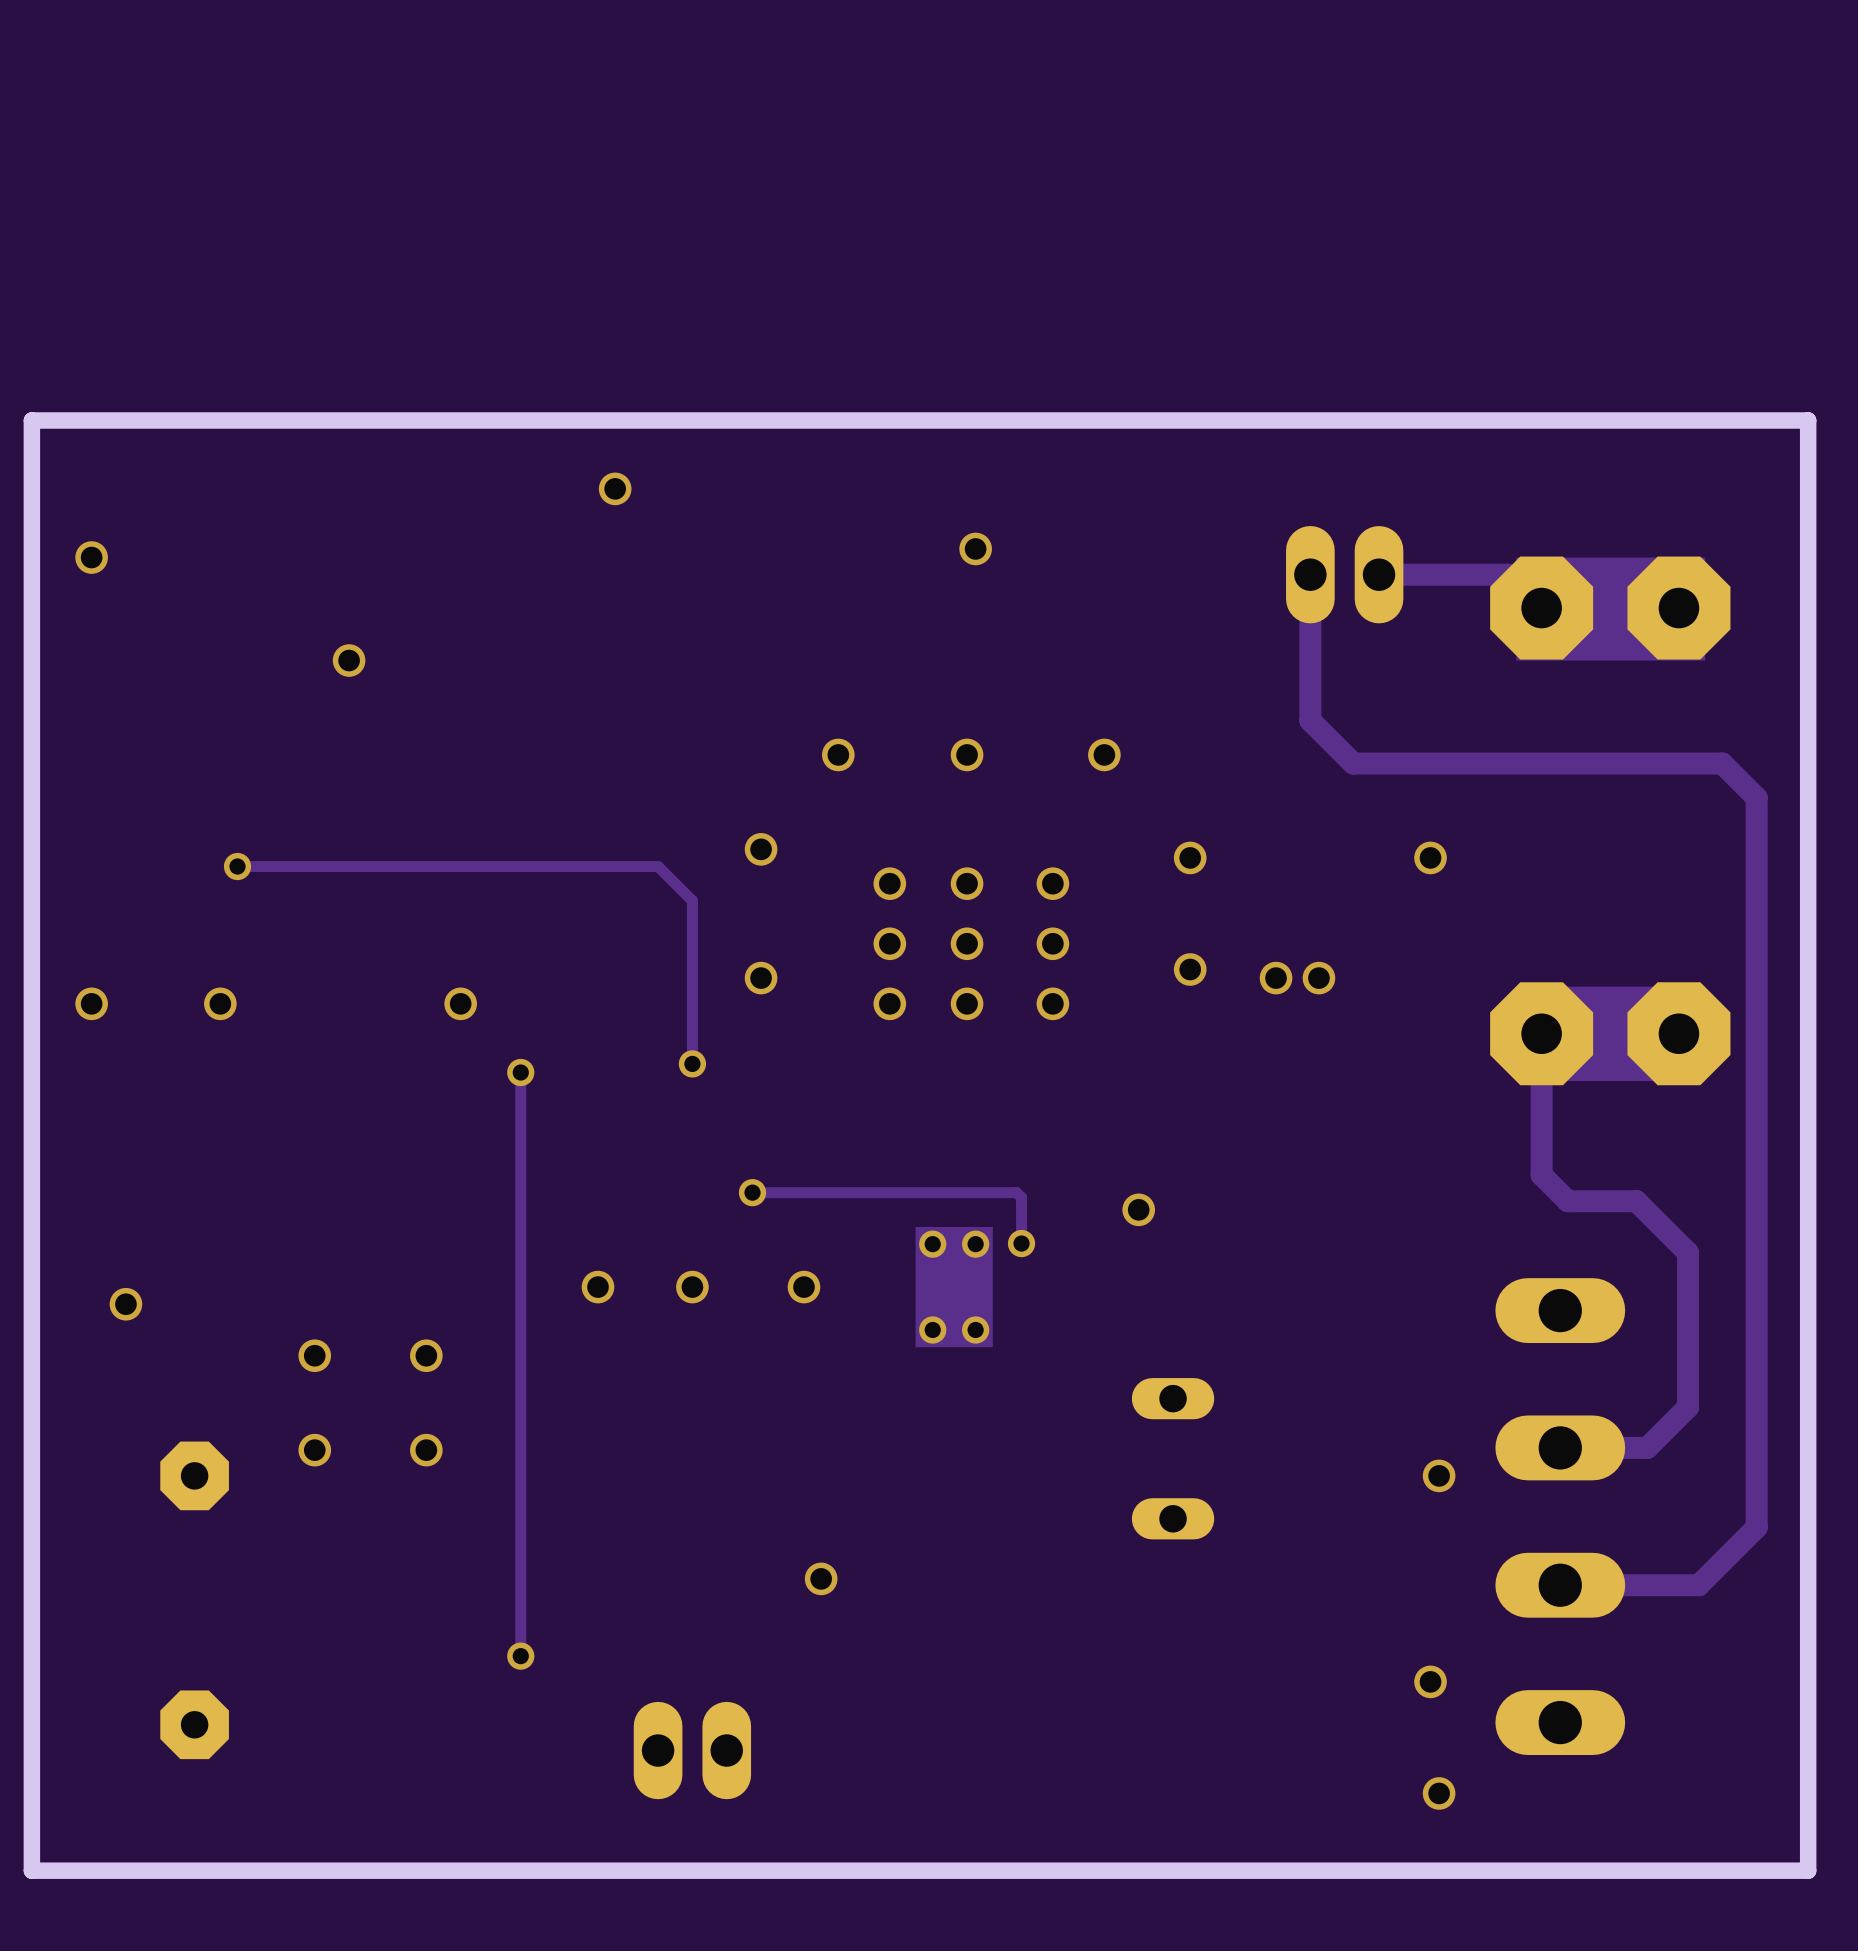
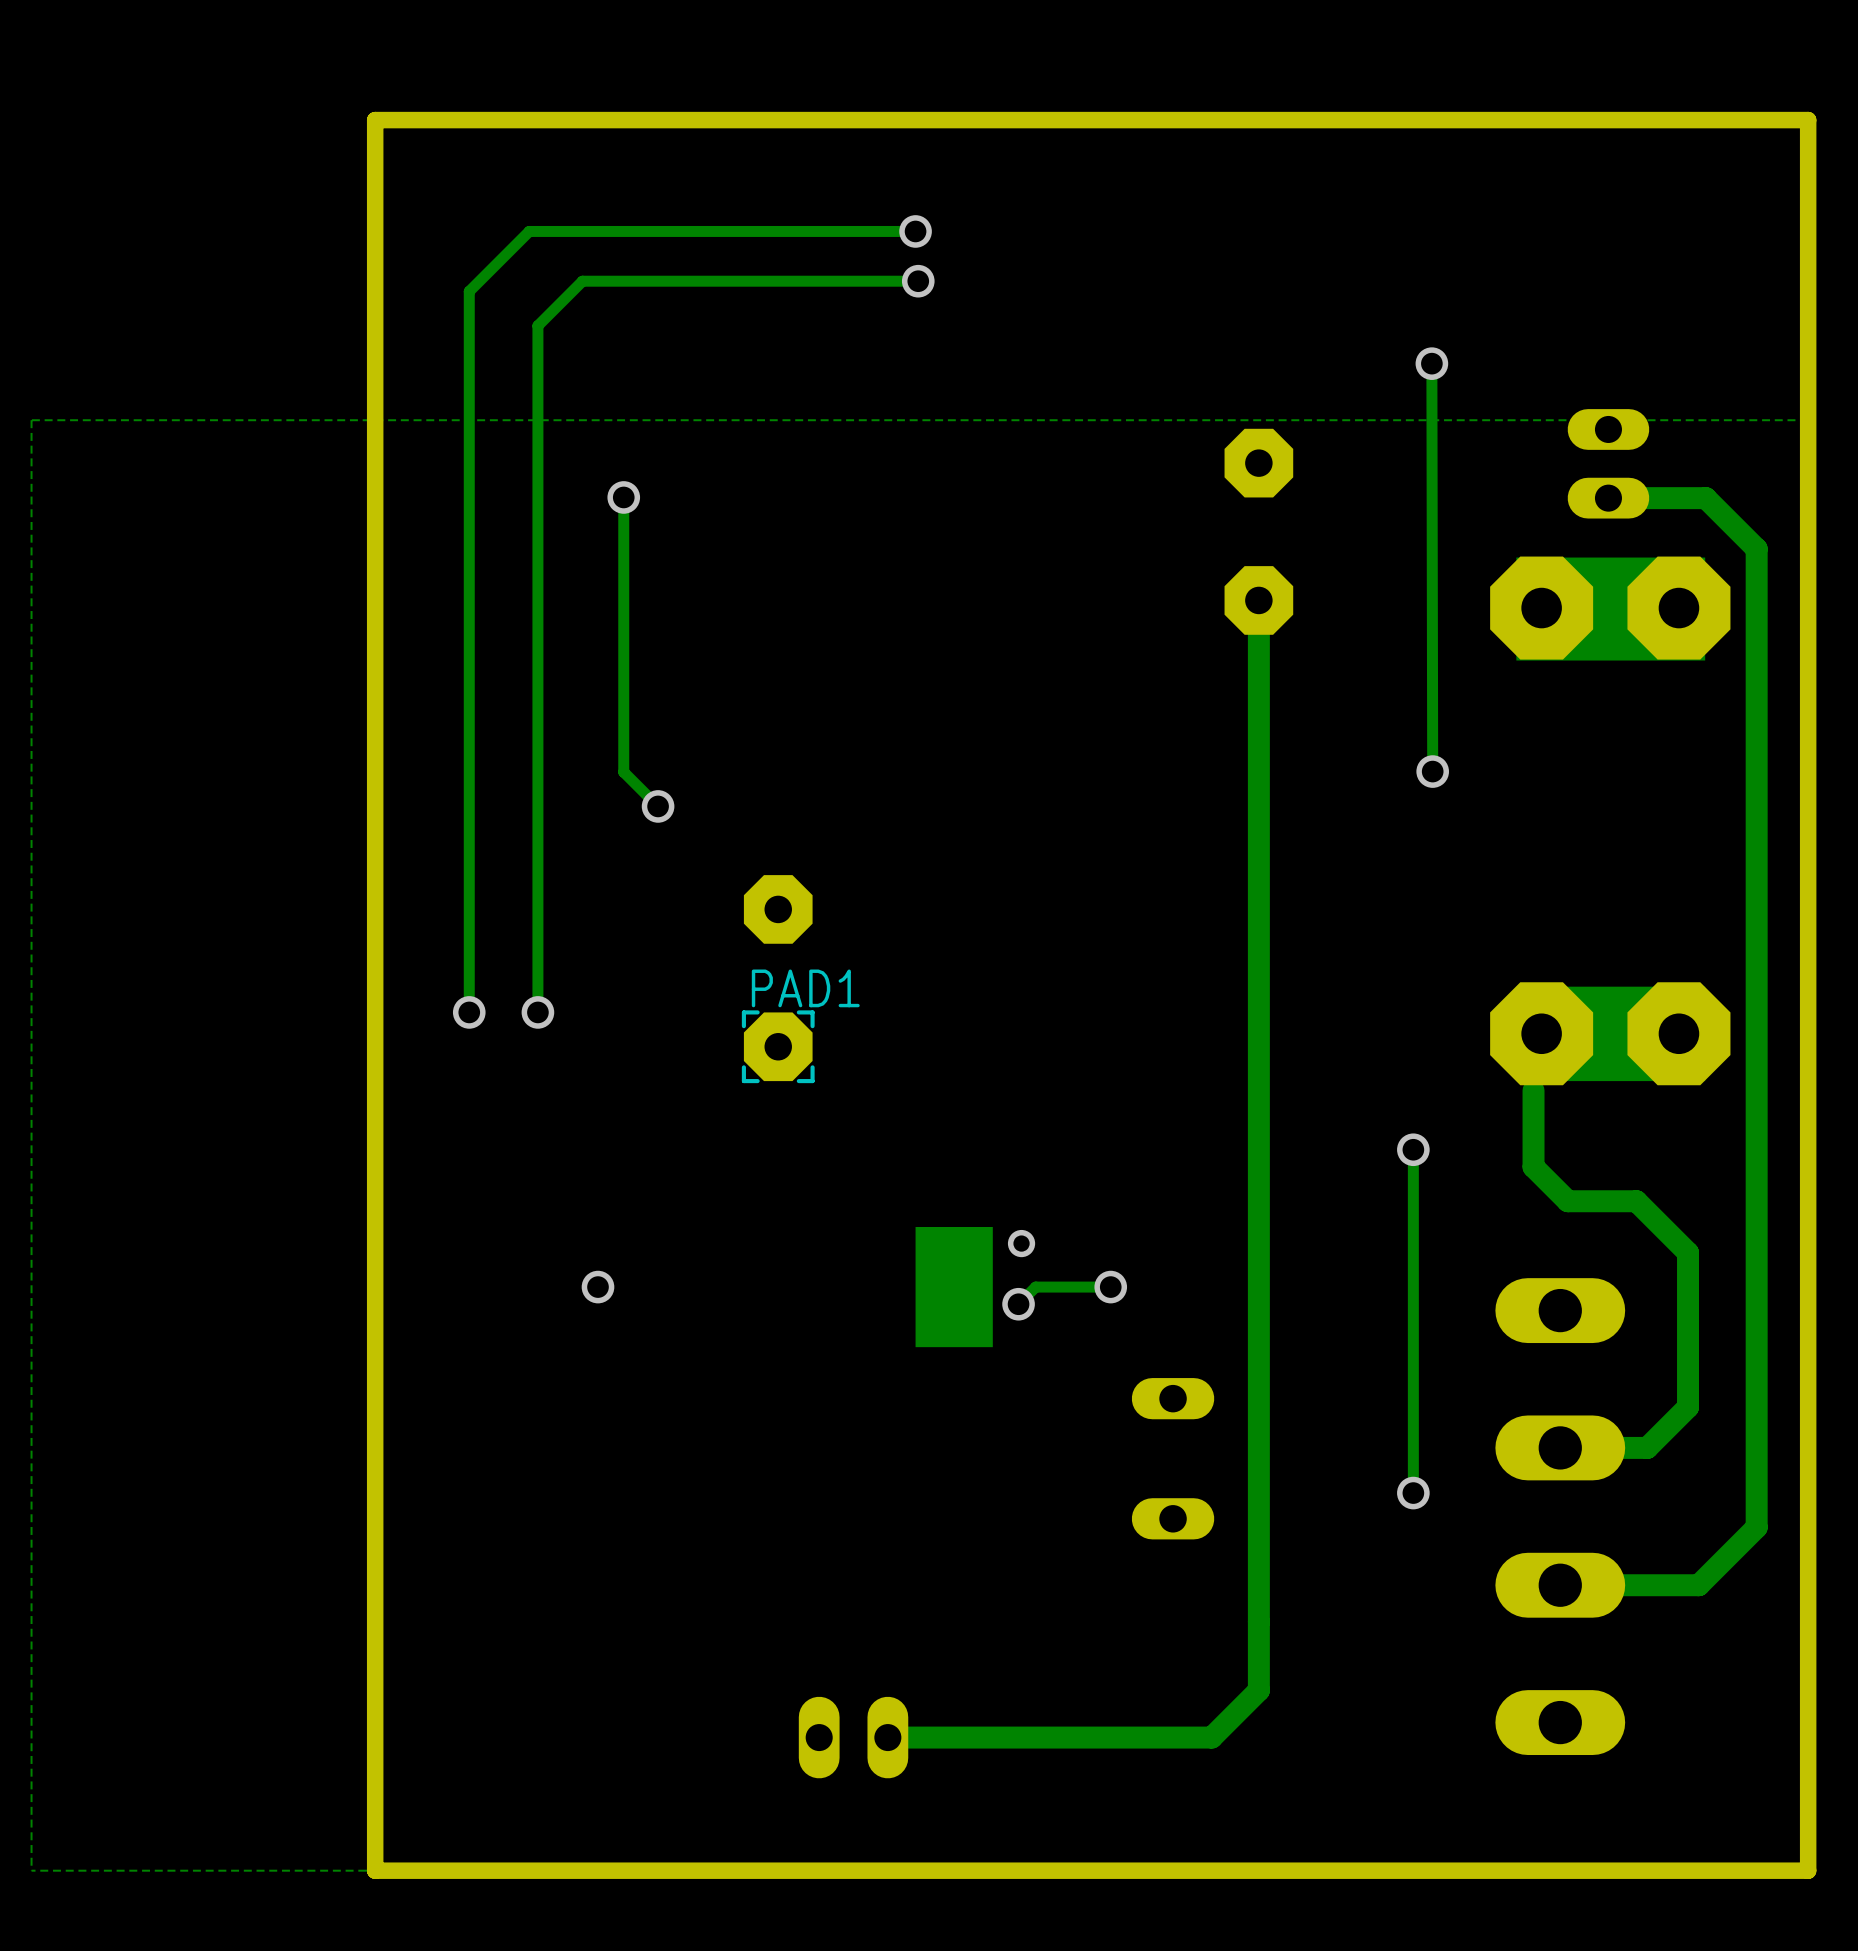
track: none -> (915, 231) (529, 231) (469, 291) (469, 1012)
via: none -> (915, 231)
track: none -> (918, 281) (582, 281) (537, 325) (537, 1012)
via: none -> (918, 281)
track: none -> (1431, 363) (1432, 771)
via: none -> (1431, 363)
board edge: (1808, 420) (31, 420) (31, 1870) (375, 1870) -> (1808, 420) (1808, 120) (375, 120) (375, 1870)
part: none -> (1258, 463)
part: none -> (1608, 463)
via position: (615, 488) -> (623, 497)
track: none -> (623, 497) (623, 772) (658, 806)
via: (975, 548) -> none
via: (91, 557) -> none
track: (1310, 574) (1310, 720) (1353, 763) (1722, 763) (1756, 797) -> (1608, 498) (1705, 498) (1756, 548) (1756, 797)
part: (1344, 574) -> none
track: (1379, 574) (1508, 574) (1541, 608) -> none
track: none -> (1258, 600) (1258, 1690) (1211, 1737) (887, 1737)
part: none -> (1258, 600)
via: (349, 660) -> none
via: (838, 754) -> none
via: (967, 754) -> none
via: (1104, 754) -> none
via: none -> (658, 806)
via: (761, 849) -> none
via: (1190, 857) -> none
via position: (1430, 857) -> (1432, 771)
track: (237, 866) (658, 866) (692, 900) (692, 1063) -> none
via: (237, 866) -> none
via: (889, 883) -> none
via: (967, 883) -> none
via: (1052, 883) -> none
part: none -> (778, 909)
via: (889, 943) -> none
via: (967, 943) -> none
via: (1052, 943) -> none
via: (1190, 969) -> none
via: (761, 978) -> none
via: (1276, 978) -> none
via: (1318, 978) -> none
via: (91, 1003) -> none
via: (220, 1003) -> none
via position: (460, 1003) -> (469, 1012)
via: (889, 1003) -> none
via: (967, 1003) -> none
via: (1052, 1003) -> none
via: none -> (537, 1012)
track: (1541, 1033) (1541, 1175) -> (1533, 1090) (1533, 1166) (1541, 1175)
PAD1: none -> (778, 1046)
via: (692, 1063) -> none
track: (520, 1072) (520, 1656) -> none
via: (520, 1072) -> none
track: none -> (1413, 1149) (1413, 1493)
via: none -> (1413, 1149)
track: (752, 1192) (1016, 1192) (1021, 1197) (1021, 1243) -> none
via: (752, 1192) -> none
via: (1138, 1209) -> none
via: (932, 1244) -> none
via: (975, 1244) -> none
via: (692, 1287) -> none
via: (803, 1287) -> none
track: none -> (1110, 1287) (1035, 1287) (1018, 1304)
via: none -> (1110, 1287)
via: (125, 1304) -> none
via: none -> (1018, 1304)
via: (932, 1329) -> none
via: (975, 1329) -> none
via: (314, 1355) -> none
via: (426, 1355) -> none
via: (314, 1450) -> none
via: (426, 1450) -> none
part: (194, 1475) -> none
via position: (1439, 1475) -> (1413, 1493)
via: (821, 1578) -> none
via: (520, 1656) -> none
via: (1430, 1681) -> none
part: (194, 1724) -> none
part: none -> (853, 1737)
part: (692, 1750) -> none
via: (1439, 1793) -> none

